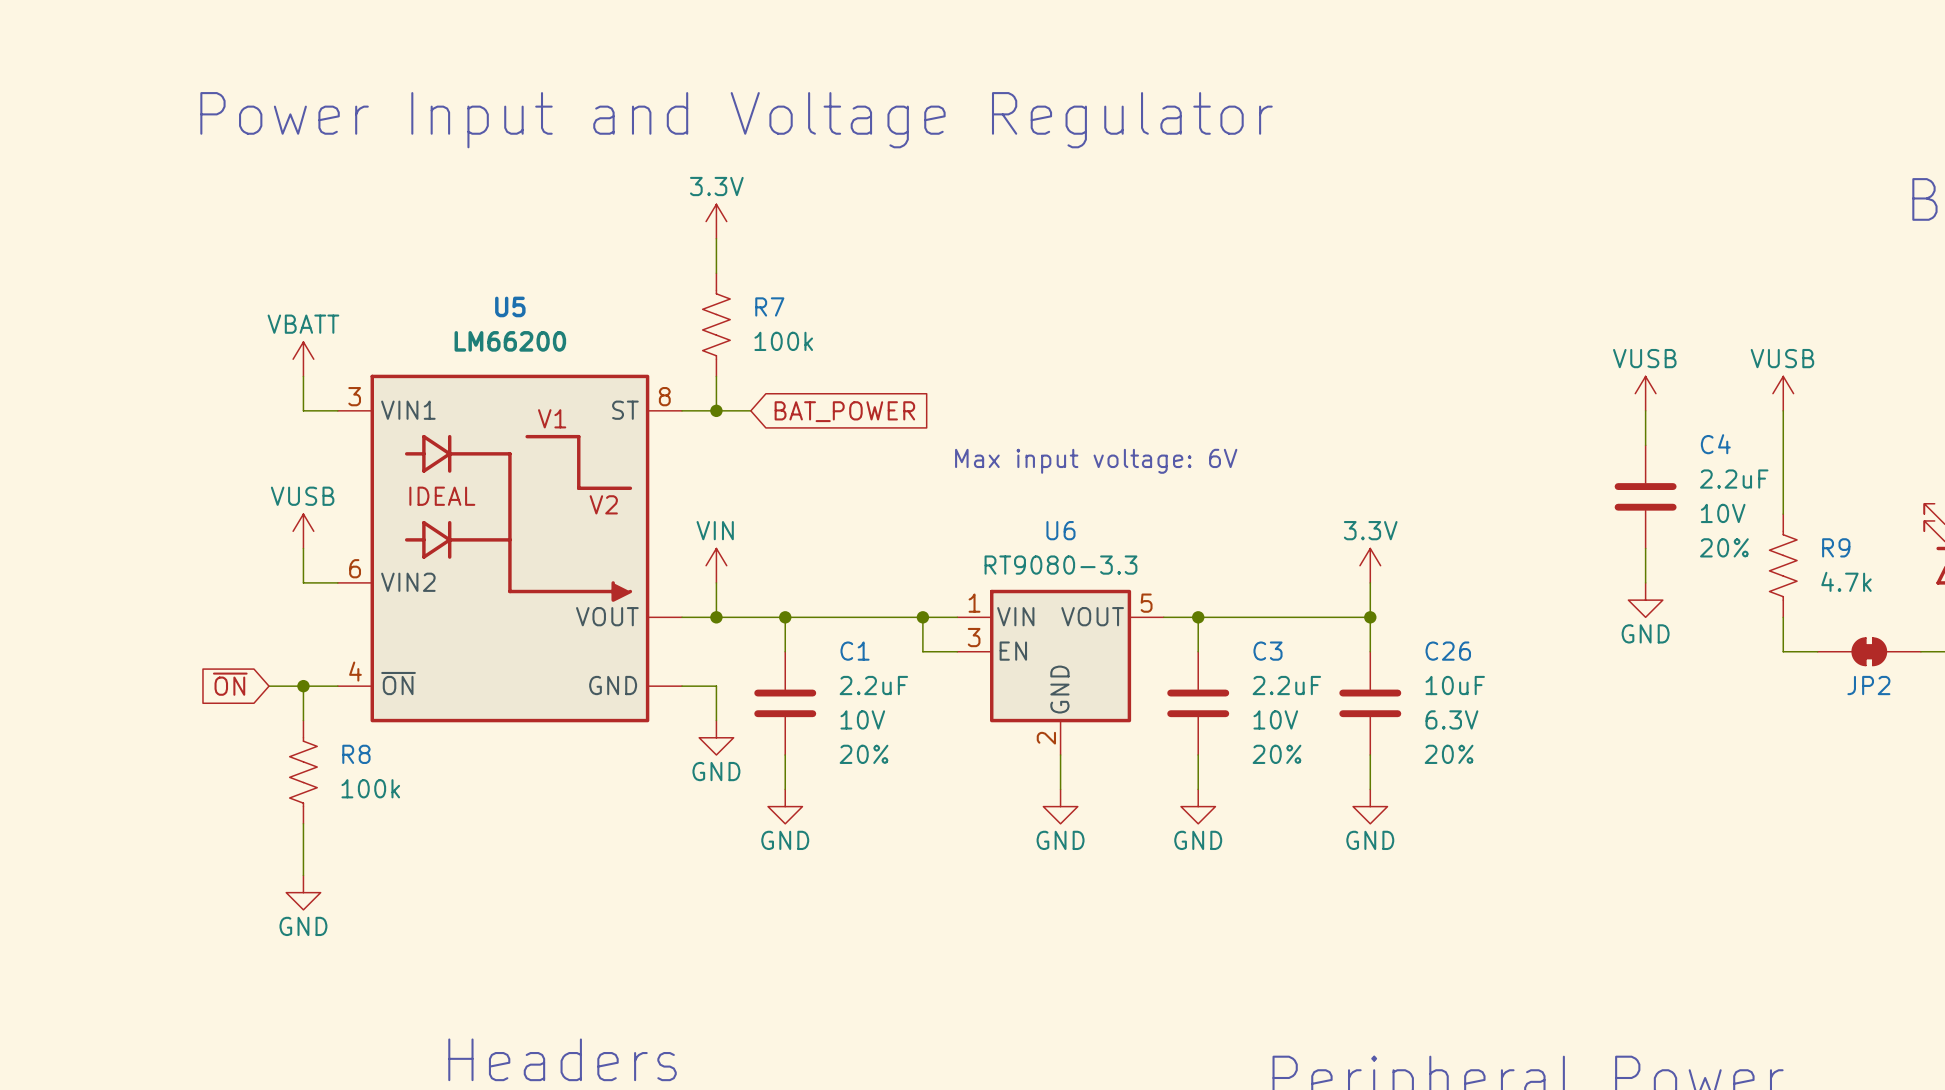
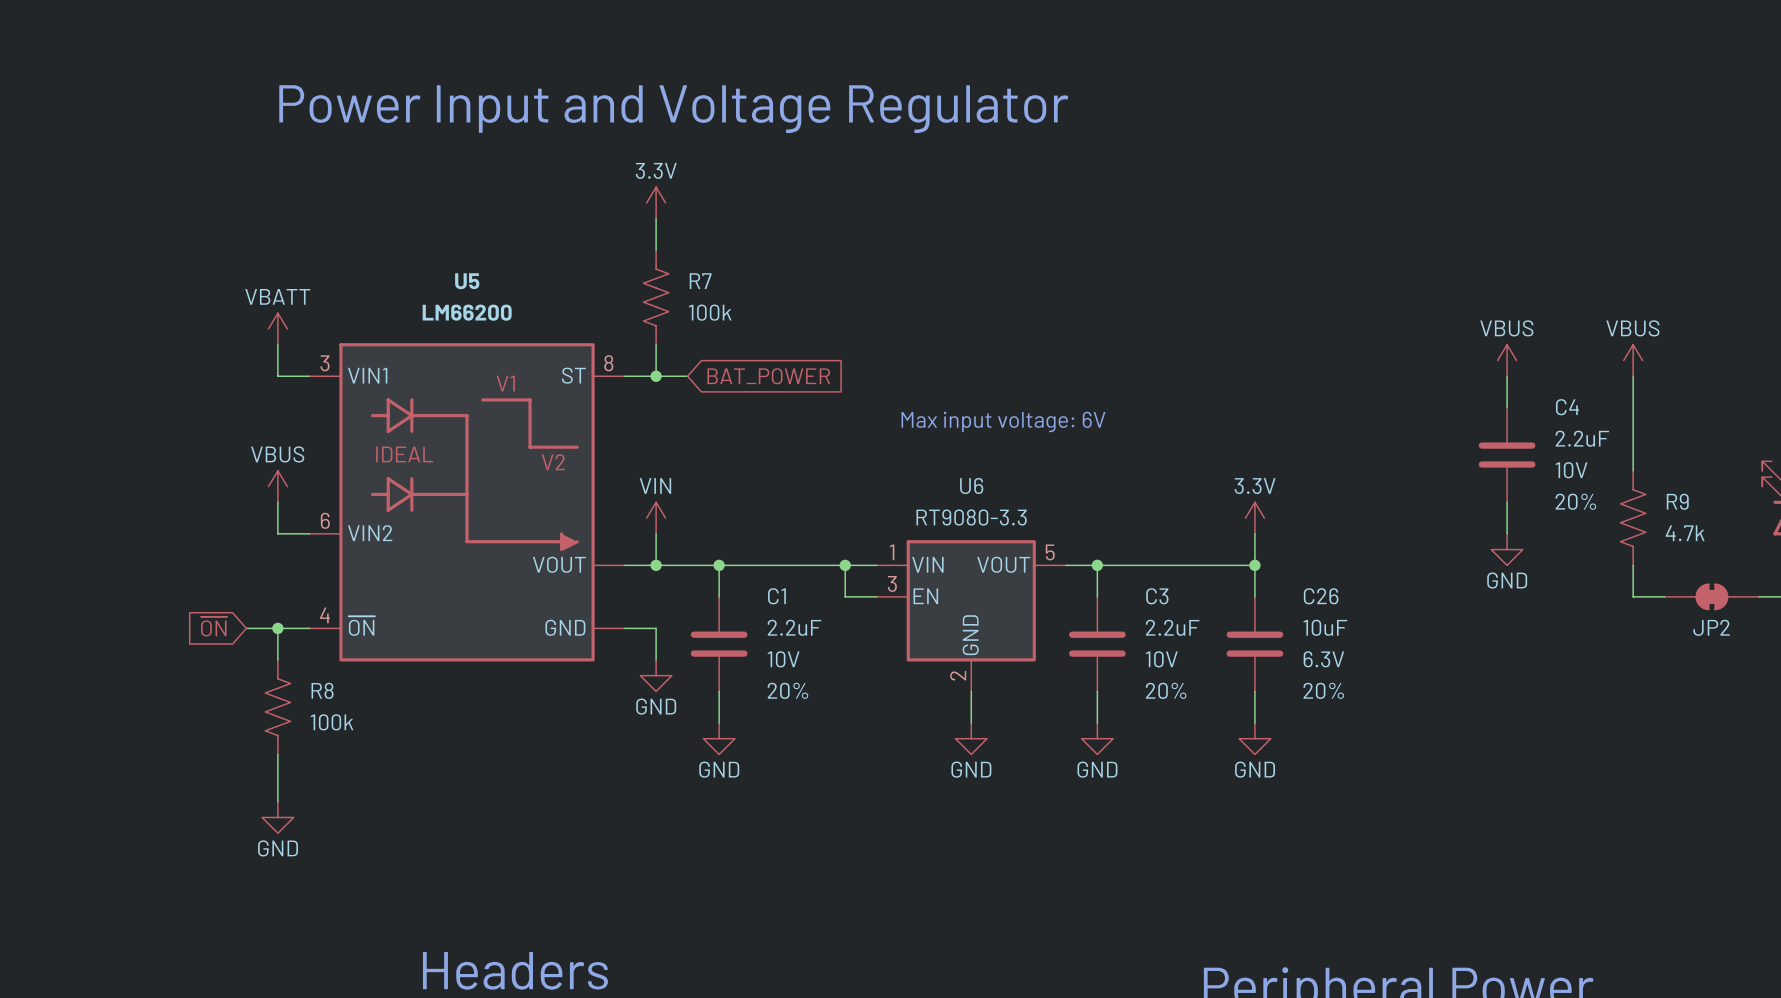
power symbol: VUSB (1645, 393) -> VBUS (1507, 360)
power symbol: VUSB (1783, 393) -> VBUS (1633, 360)
power symbol: VUSB (303, 531) -> VBUS (277, 486)

